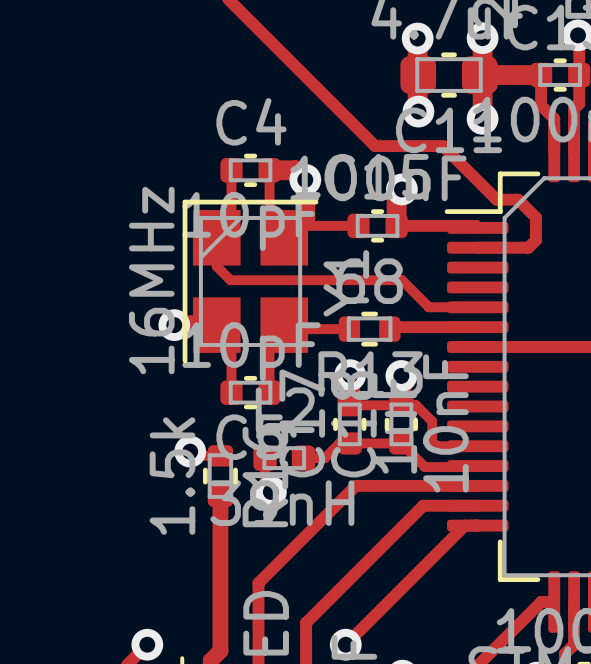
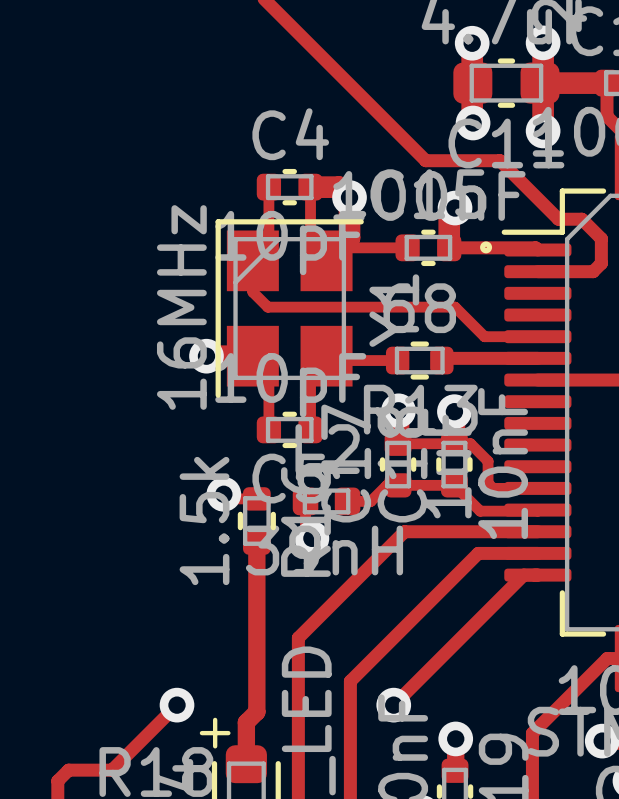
drawing: none -> [480, 241, 493, 254]

